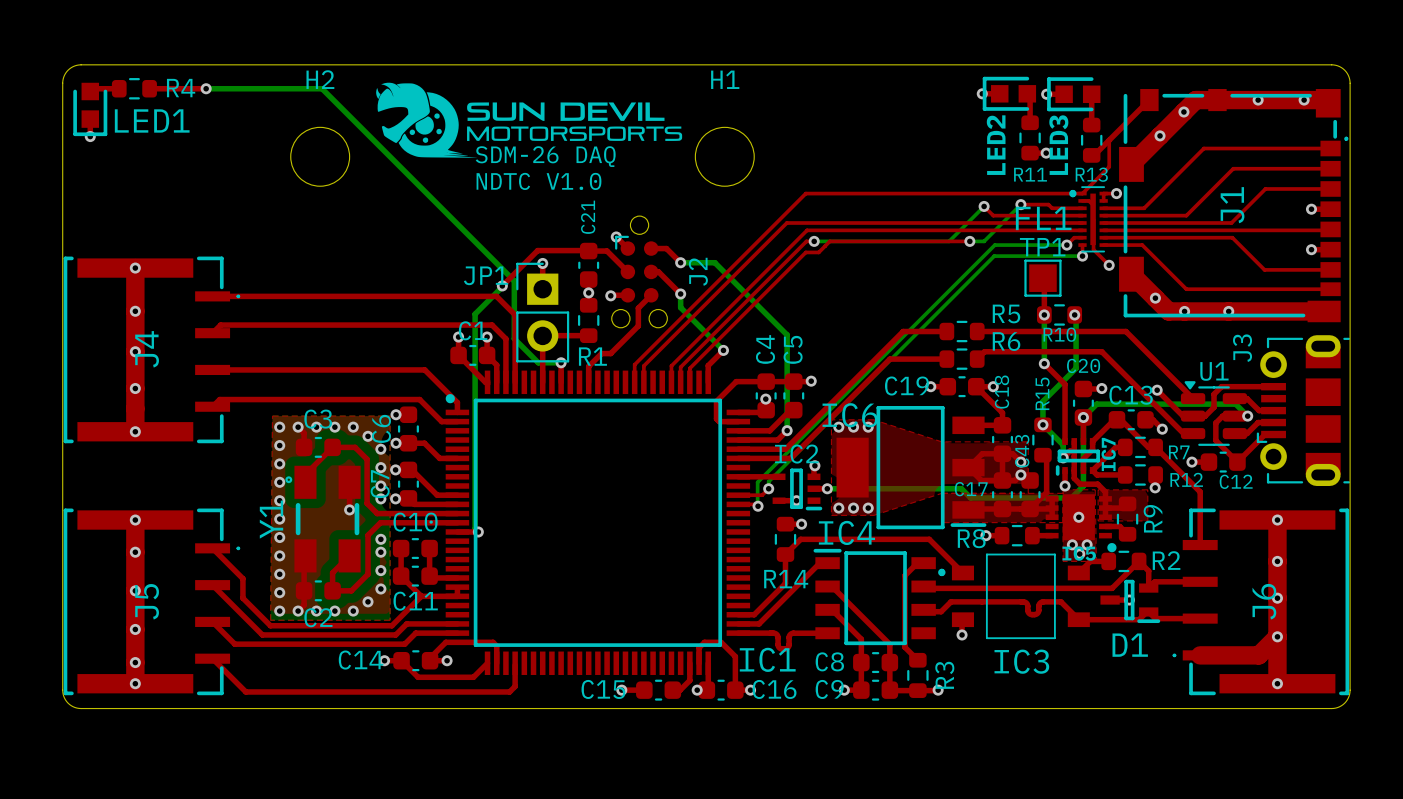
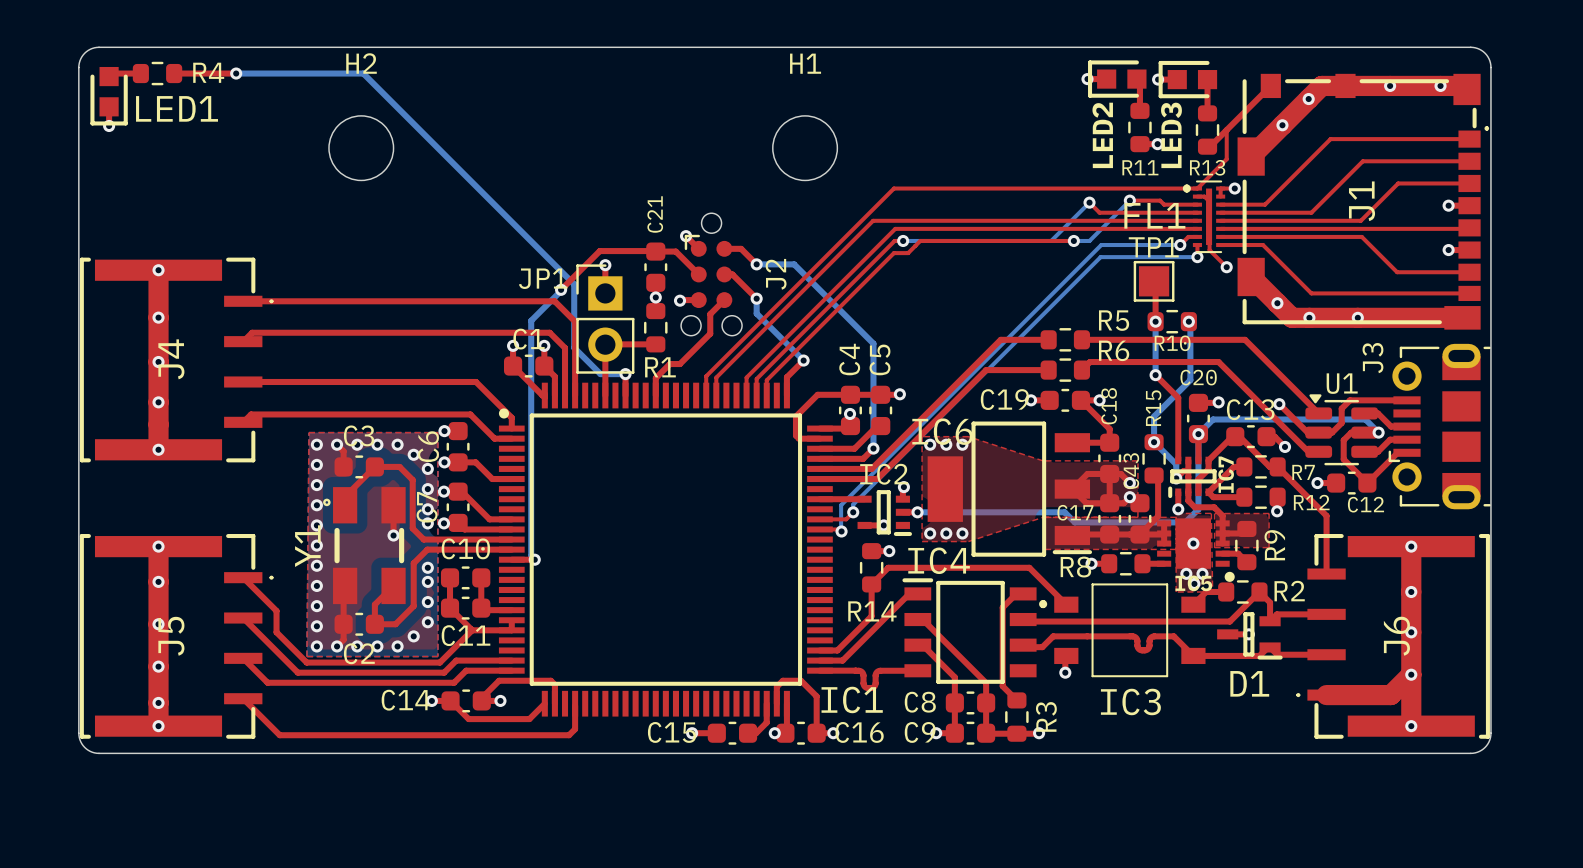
drawing: [376, 82, 683, 158] -> none
text: SDM-26 DAQ (545, 156) -> none
text: NDTC V1.0 (538, 181) -> none

